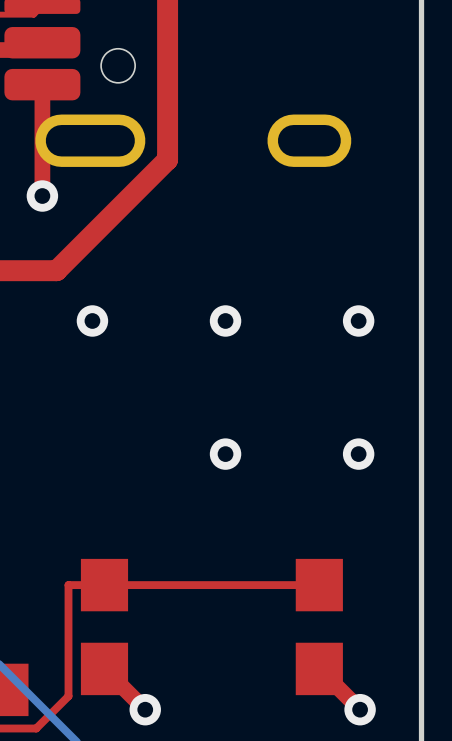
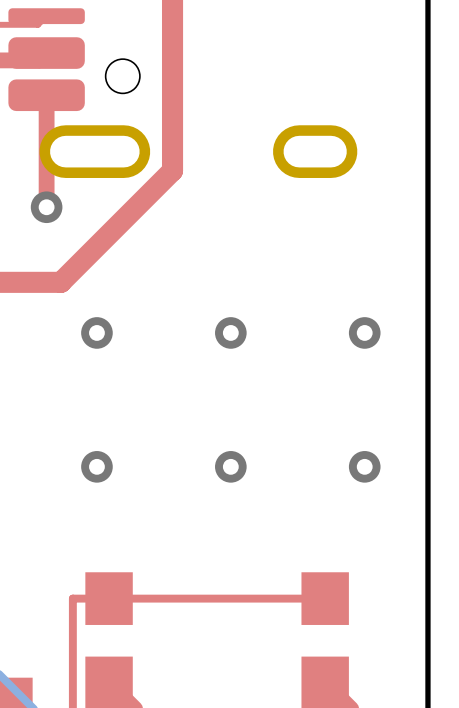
via: none -> (96, 466)

